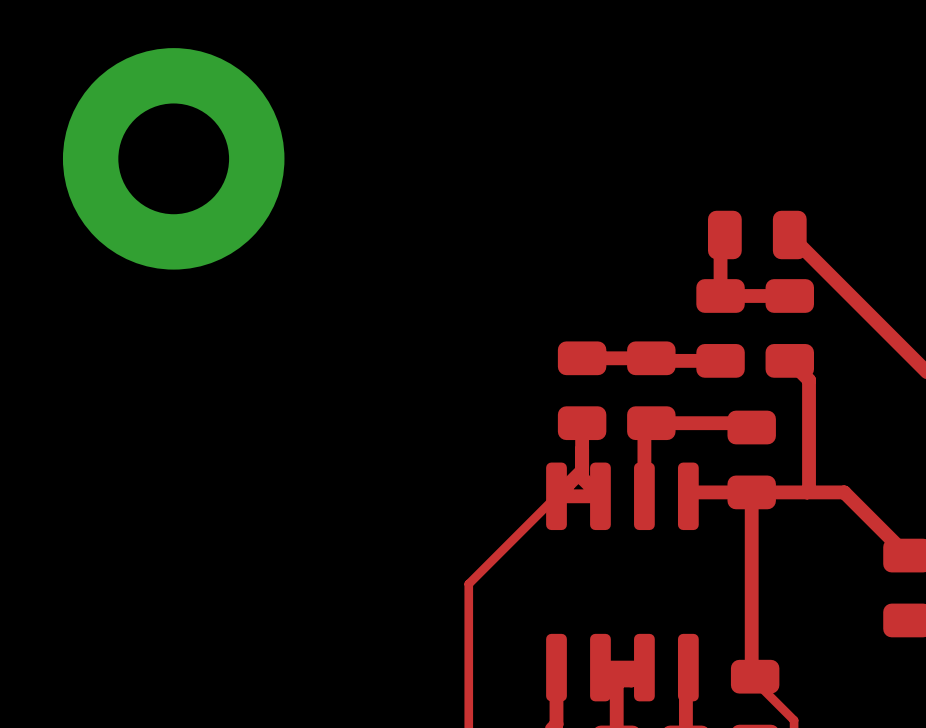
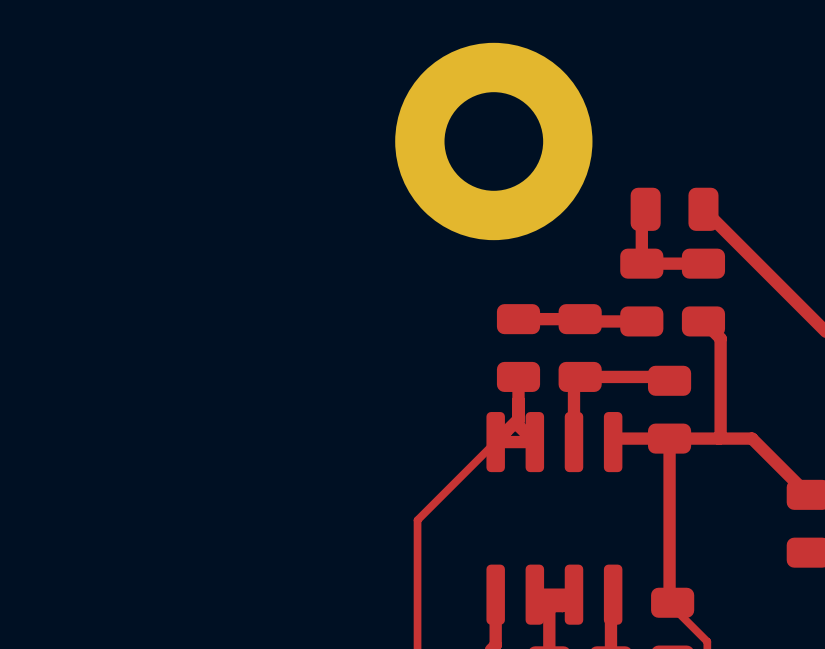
part position: (173, 158) -> (493, 141)

